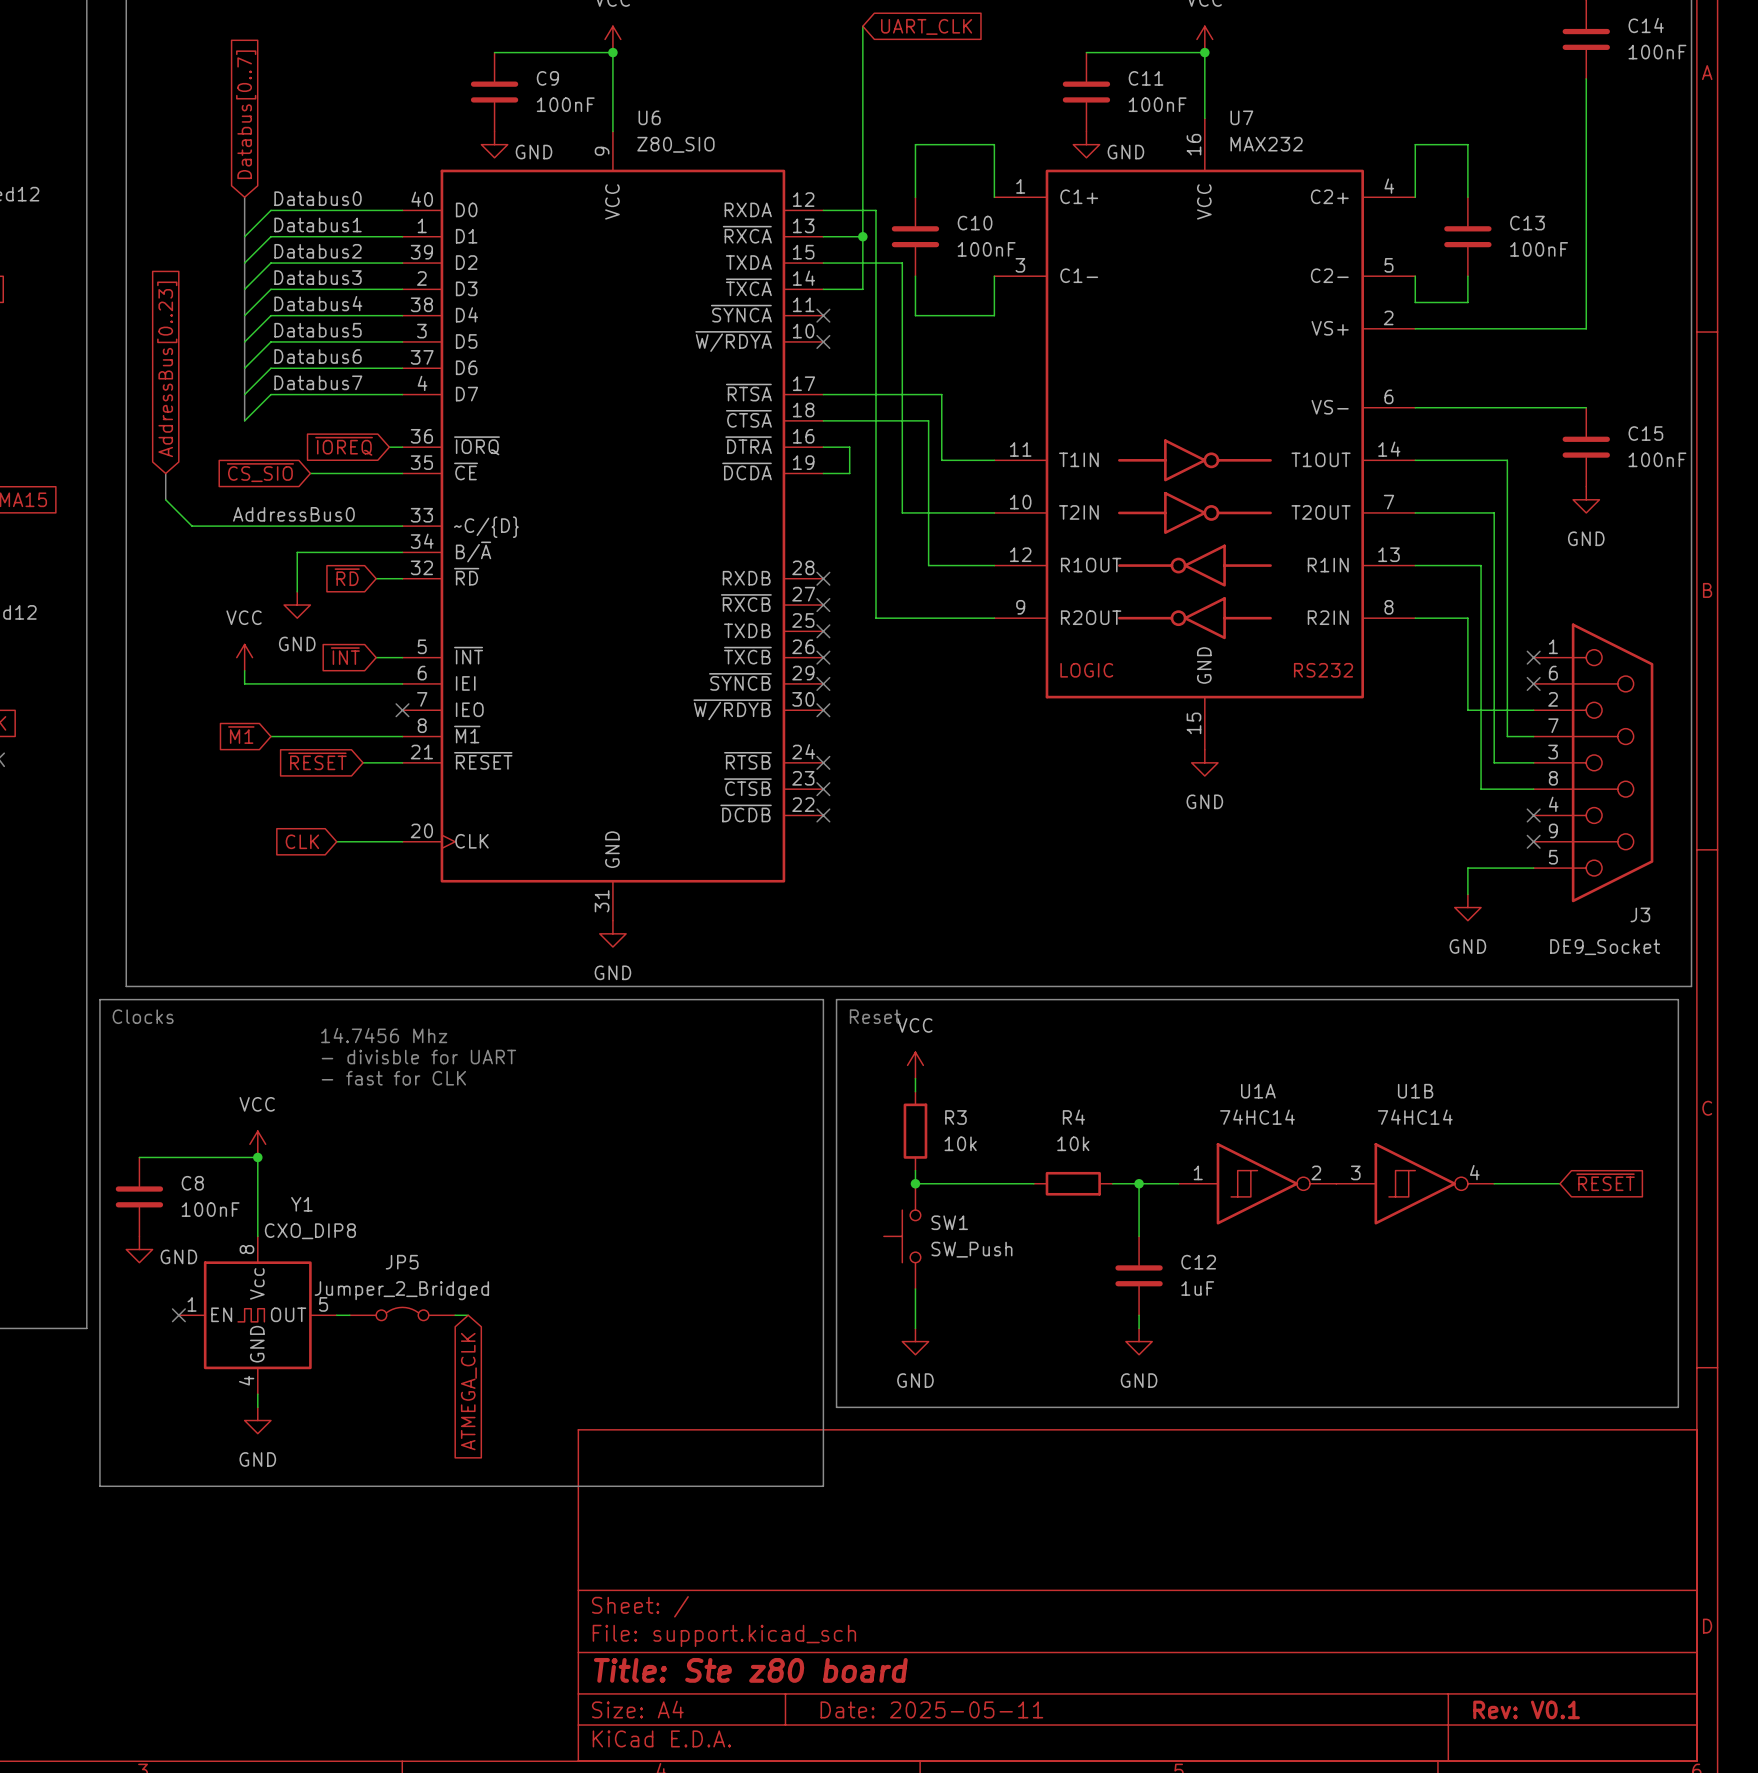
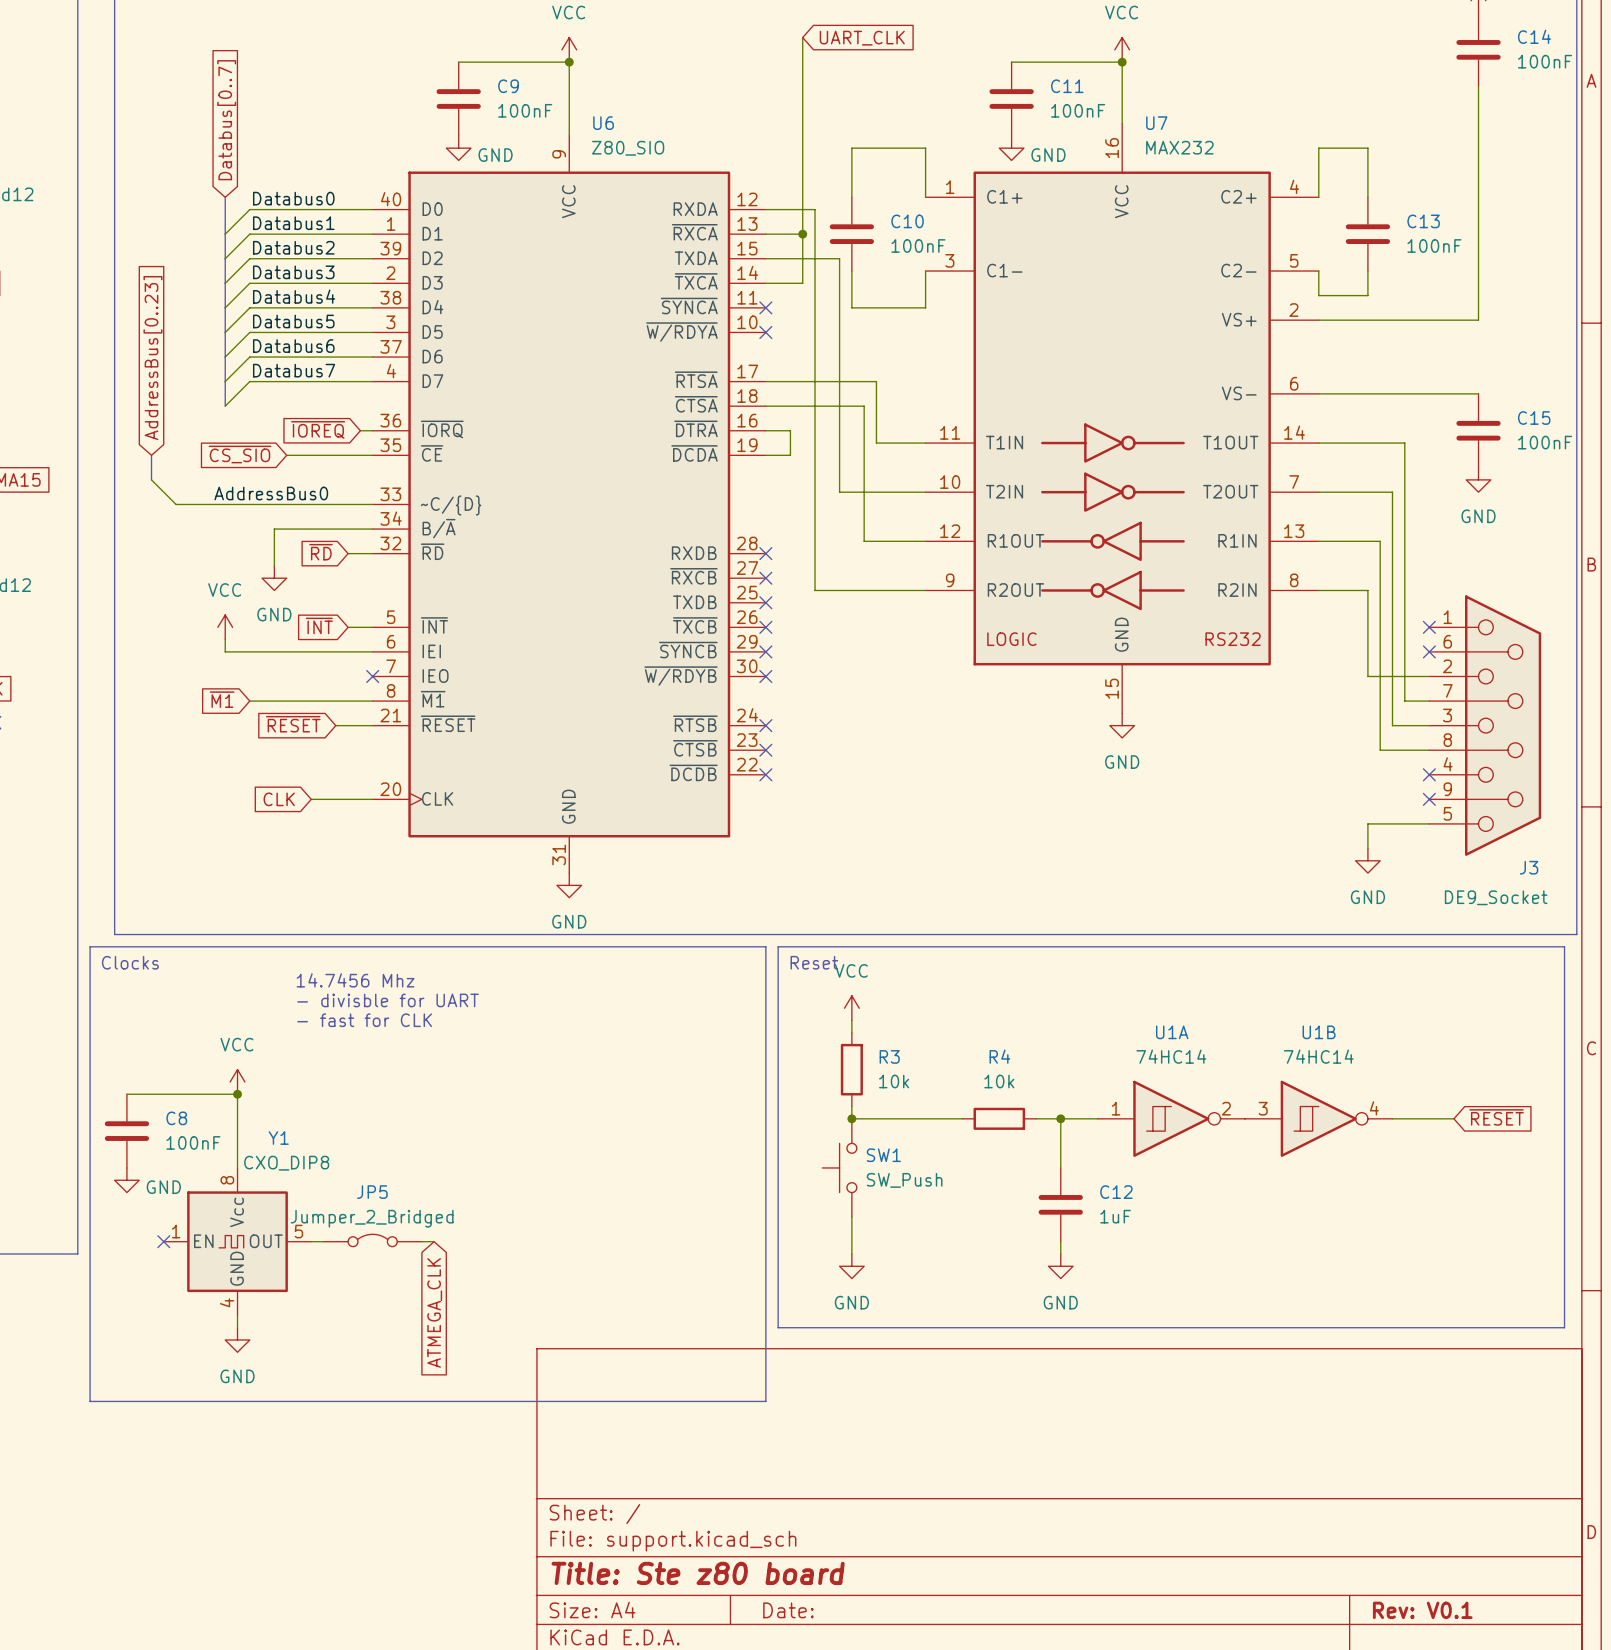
title block: Date: 2025-05-11 (931, 1709) -> Date: (788, 1610)

